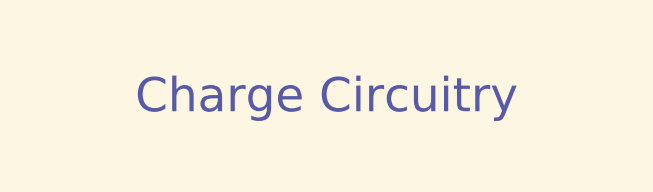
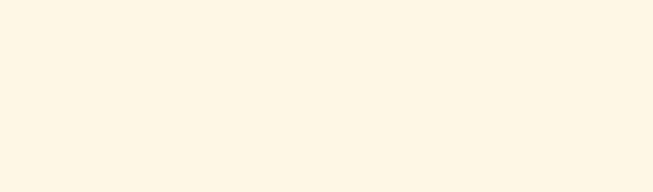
text: Charge Circuitry (327, 98) -> none

